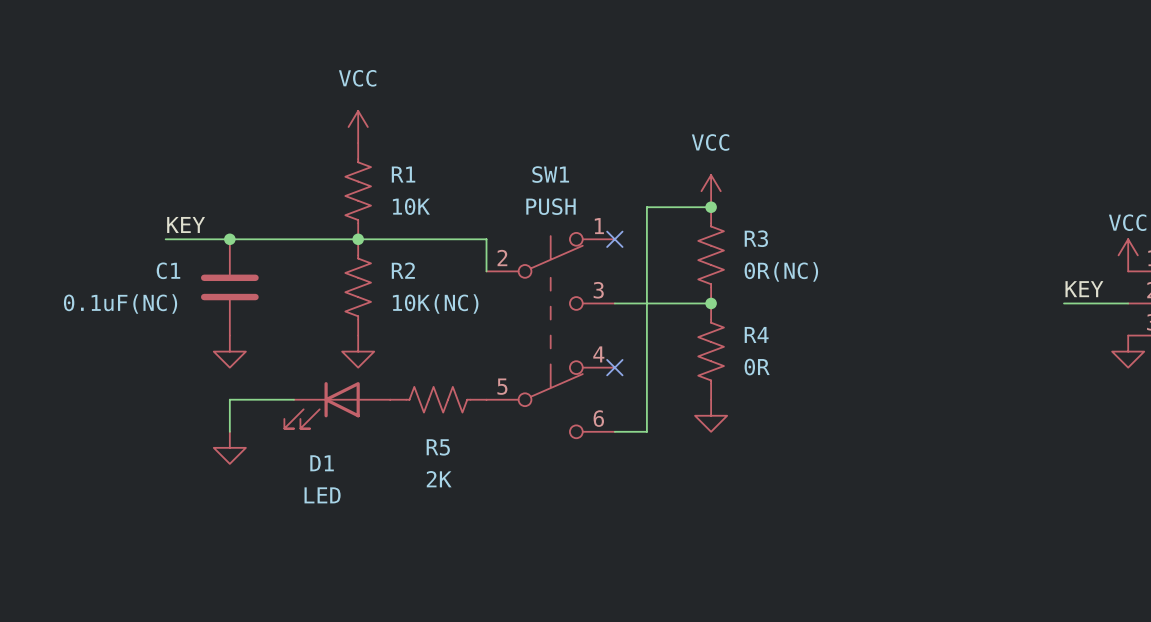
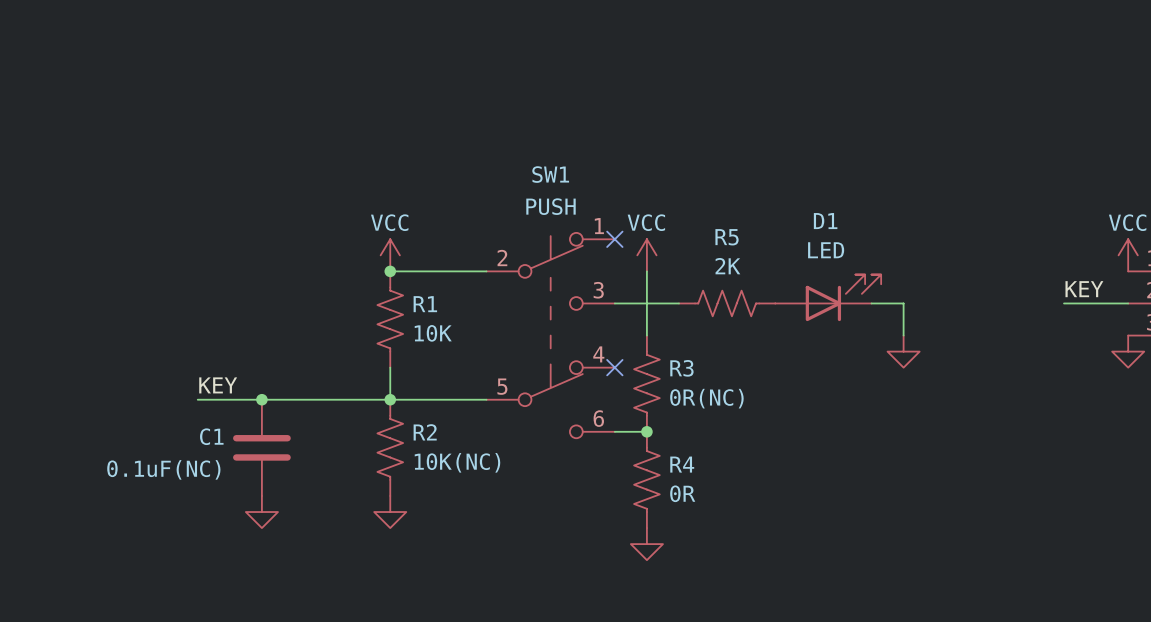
power symbol text position: VCC (357, 78) -> VCC (389, 222)
power symbol position: VCC (358, 127) -> VCC (390, 255)
power symbol text position: VCC (710, 142) -> VCC (646, 222)
R1 name position: R1 (403, 174) -> R1 (425, 304)
R1 position: (358, 191) -> (390, 319)
power symbol position: VCC (711, 191) -> VCC (646, 255)
R1 value position: 10K (411, 206) -> 10K (433, 333)
wire: (711, 207) (646, 207) (646, 271) -> none
junction: (711, 207) -> none
label position: KEY (186, 224) -> KEY (218, 385)
R3 name position: R3 (756, 238) -> R3 (681, 368)
wire: (165, 239) (486, 239) (486, 271) -> (390, 271) (486, 271)
junction: (229, 239) -> none
junction position: (358, 239) -> (390, 271)
R3 position: (711, 255) -> (646, 383)
C1 name position: C1 (168, 270) -> C1 (211, 436)
R2 name position: R2 (403, 270) -> R2 (425, 432)
R3 value position: 0R(NC) (781, 271) -> 0R(NC) (706, 398)
C1 position: (229, 287) -> (261, 447)
R2 position: (358, 287) -> (390, 447)
C1 value position: 0.1uF(NC) (120, 303) -> 0.1uF(NC) (163, 469)
R2 value position: 10K(NC) (435, 303) -> 10K(NC) (457, 462)
junction: (711, 303) -> none
wire: none -> (871, 303) (903, 303) (903, 335)
R4 name position: R4 (756, 334) -> R4 (682, 464)
power symbol: (229, 351) -> none
power symbol: (358, 351) -> none
R4 position: (711, 351) -> (646, 479)
power symbol: none -> (903, 351)
wire: none -> (390, 367) (390, 399)
R4 value position: 0R (757, 367) -> 0R (682, 493)
wire: (229, 399) (229, 431) -> (229, 399) (197, 399)
junction: none -> (261, 399)
junction: none -> (390, 399)
R5 position: (438, 399) -> (727, 303)
D1 rotation: 0° (322, 405) -> 180° (843, 297)
D1 position: (337, 405) -> (828, 297)
power symbol: (711, 415) -> none
junction: none -> (646, 431)
power symbol position: (229, 447) -> (261, 512)
R5 name position: R5 (438, 447) -> R5 (727, 237)
R5 value position: 2K (439, 479) -> 2K (727, 266)
D1 value position: LED (322, 495) -> LED (826, 250)
power symbol: none -> (390, 512)
power symbol: none -> (646, 544)

